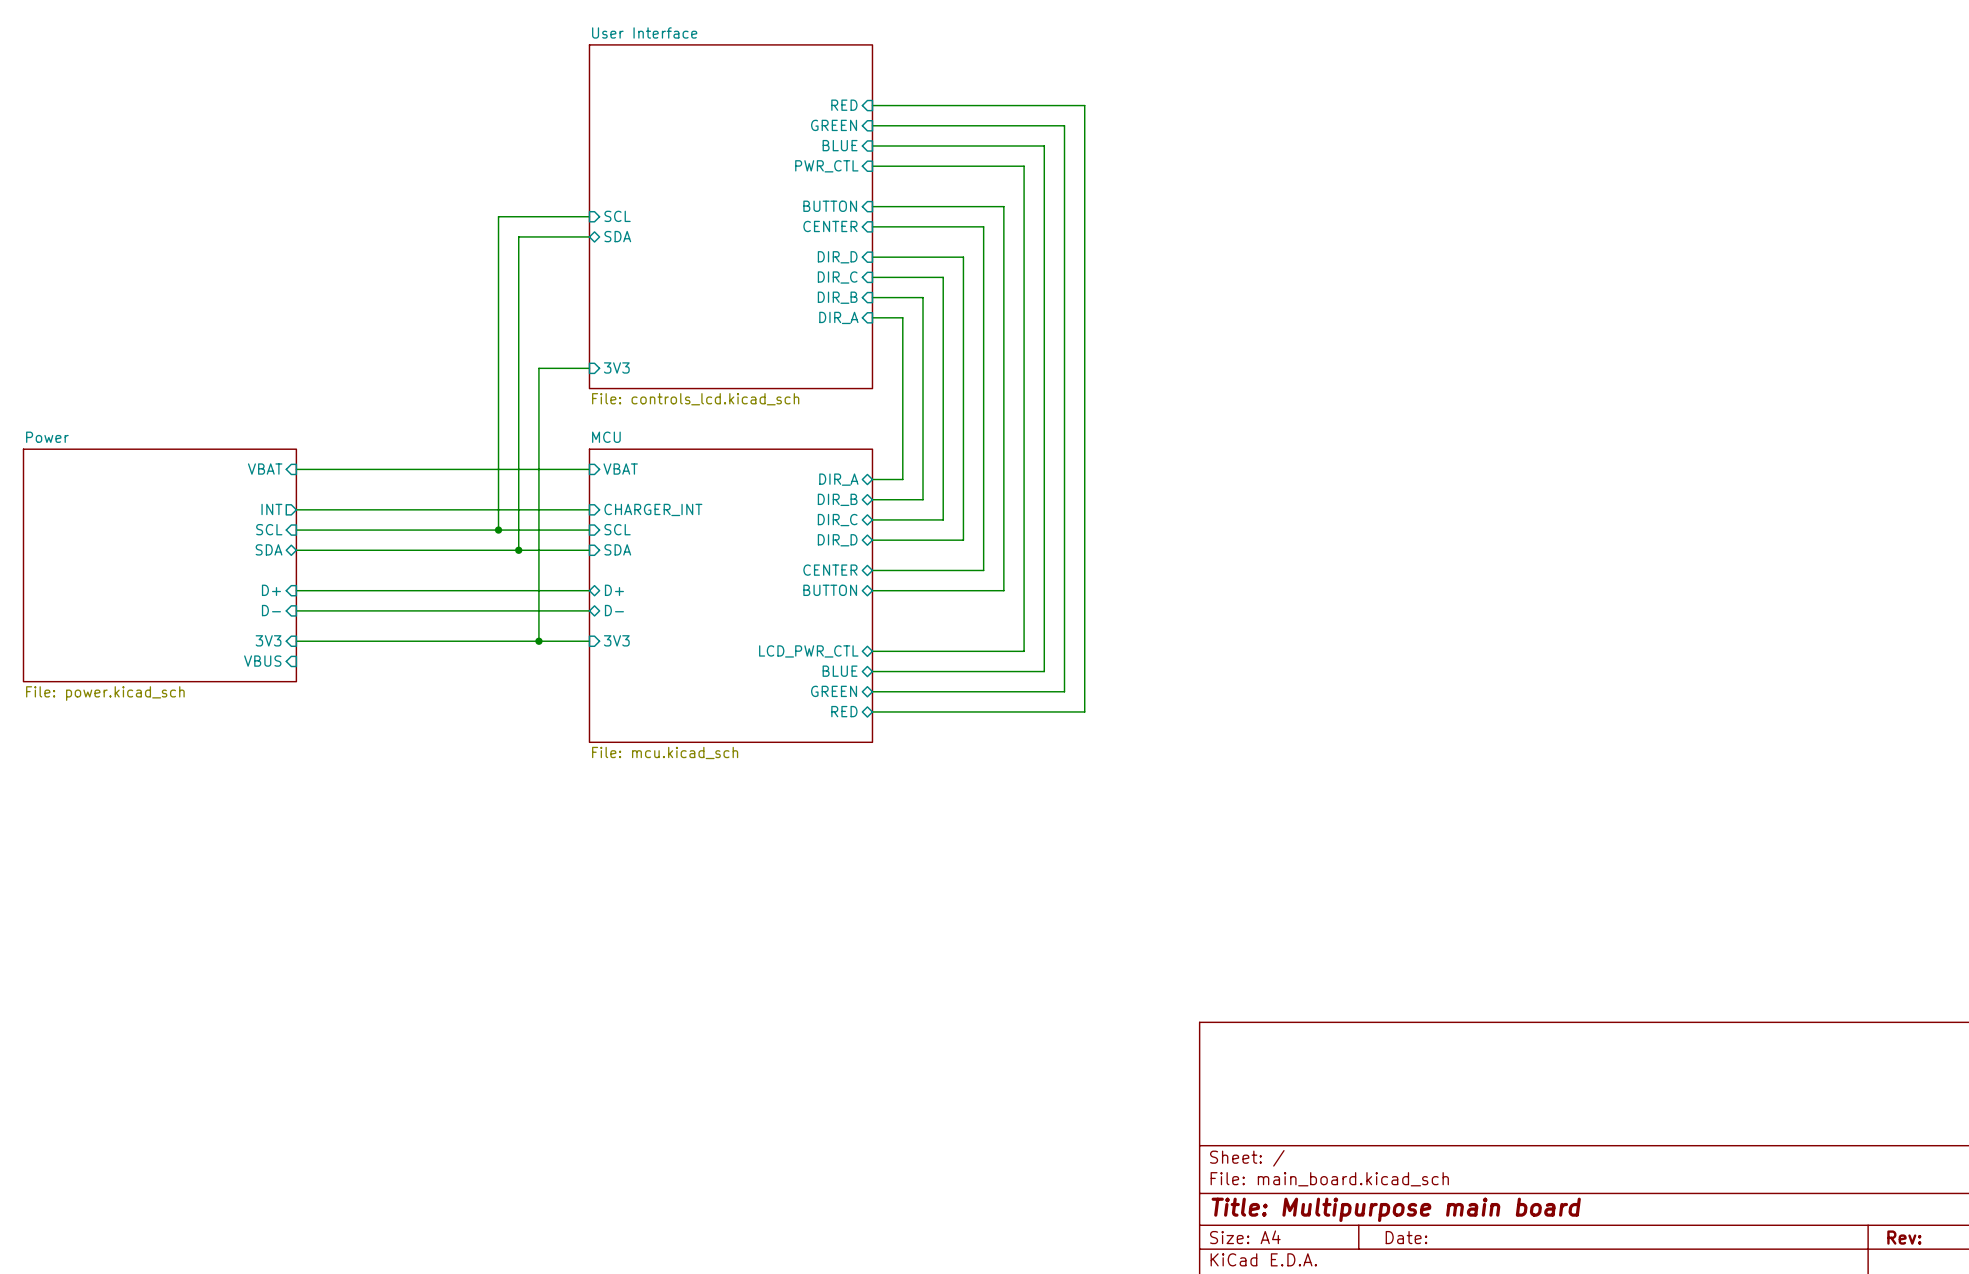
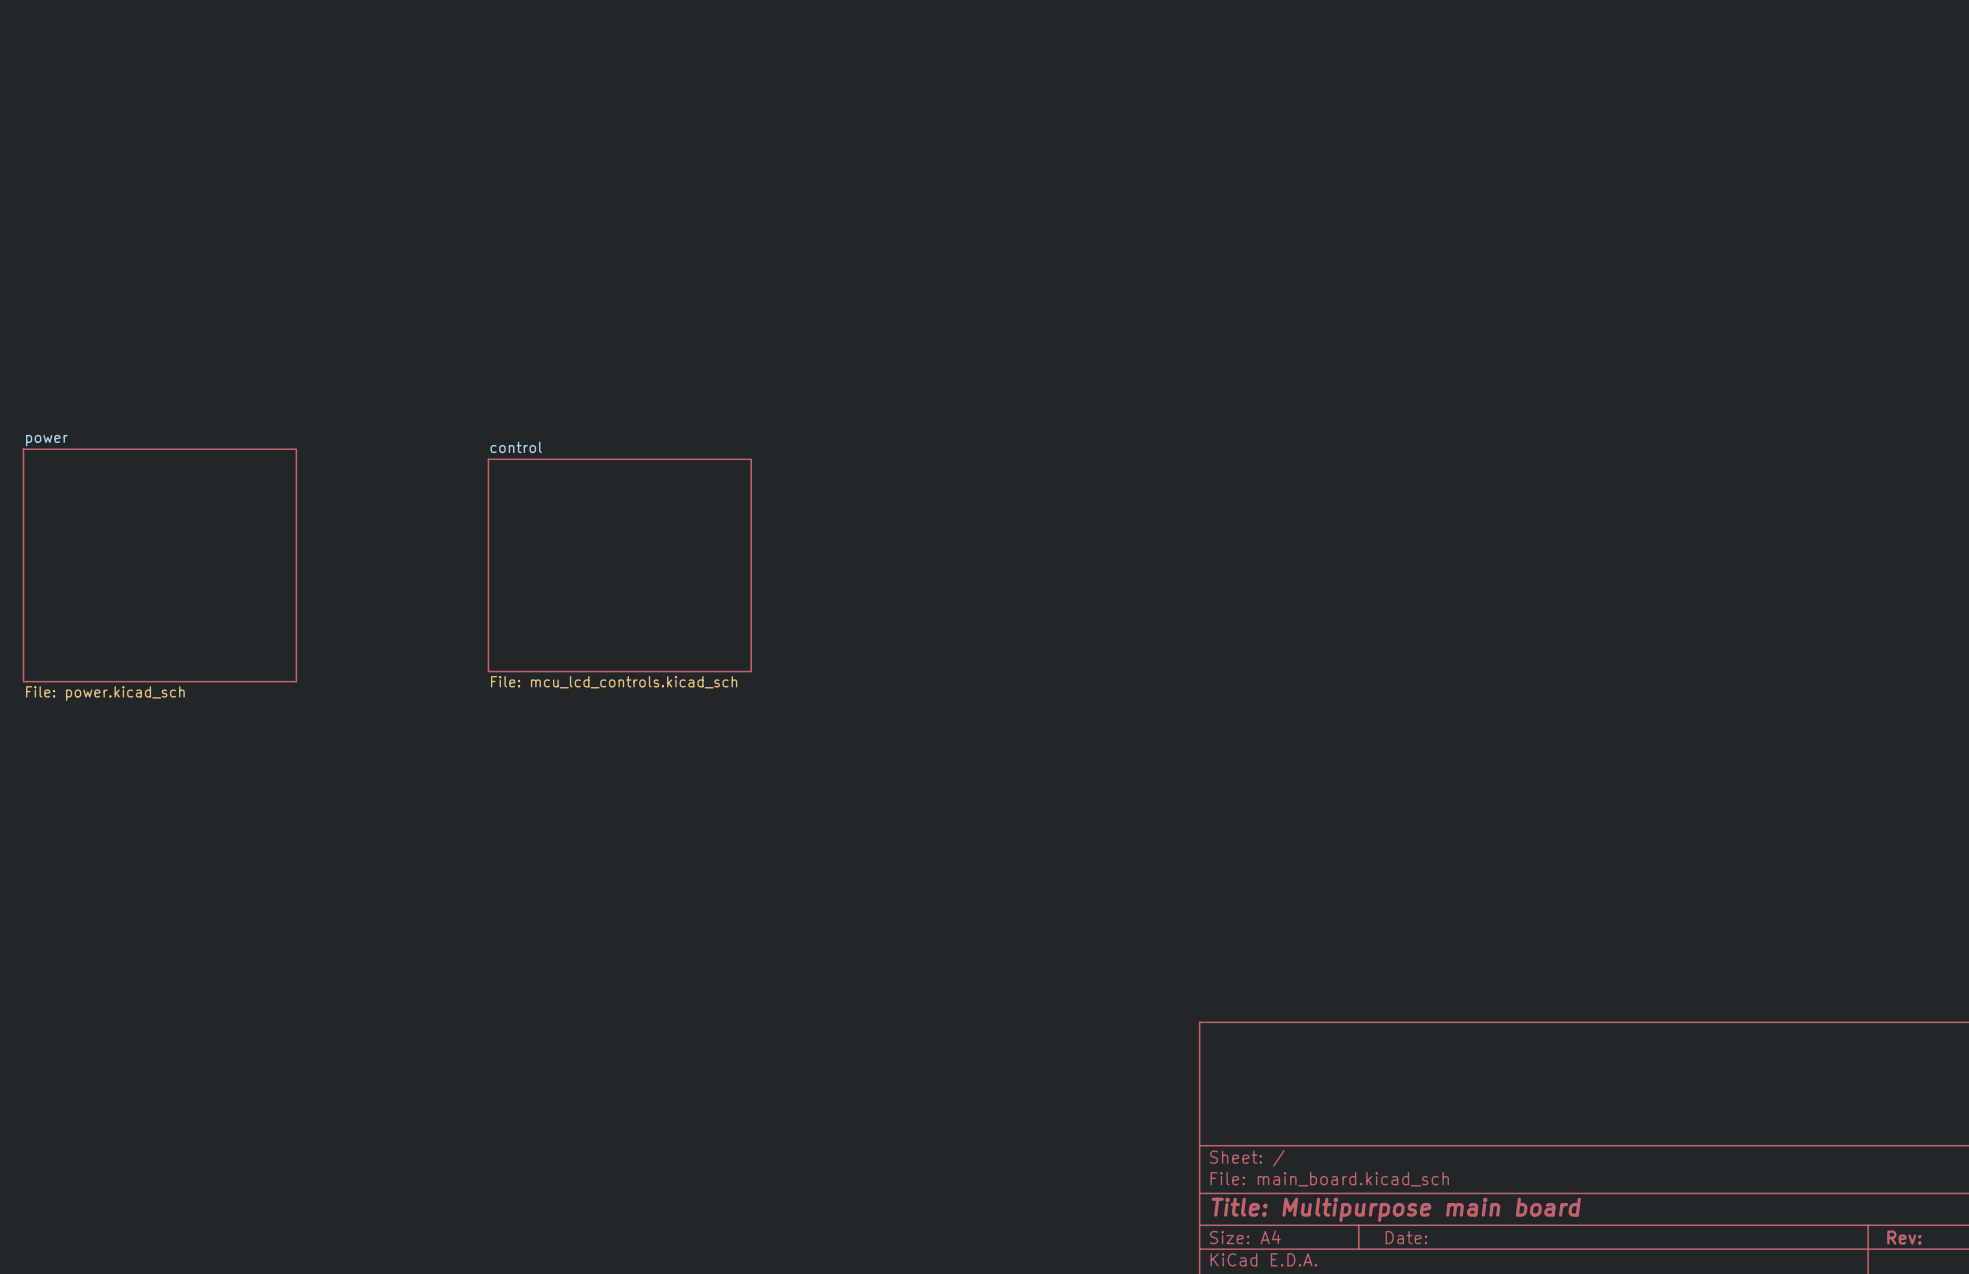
sheet pin: RED (844, 105) -> none
wire: (872, 105) (1084, 105) (1084, 711) (872, 711) -> none
sheet pin: GREEN (834, 125) -> none
wire: (872, 125) (1064, 125) (1064, 691) (872, 691) -> none
sheet pin: BLUE (840, 145) -> none
wire: (872, 145) (1044, 145) (1044, 671) (872, 671) -> none
sheet pin: PWR_CTL (826, 166) -> none
wire: (872, 166) (1024, 166) (1024, 651) (872, 651) -> none
sheet pin: BUTTON (830, 206) -> none
wire: (872, 206) (1003, 206) (1003, 590) (872, 590) -> none
wire: (589, 216) (498, 216) (498, 530) -> none
sheet pin: SCL (617, 216) -> none
sheet User Interface: File: controls_lcd.kicad_sch (730, 216) -> none
sheet pin: CENTER (830, 226) -> none
wire: (872, 226) (983, 226) (983, 570) (872, 570) -> none
wire: (589, 236) (518, 236) (518, 550) -> none
sheet pin: SDA (617, 236) -> none
sheet pin: DIR_D (837, 257) -> none
wire: (872, 257) (963, 257) (963, 540) (872, 540) -> none
sheet pin: DIR_C (837, 277) -> none
wire: (872, 277) (943, 277) (943, 519) (872, 519) -> none
sheet pin: DIR_B (837, 297) -> none
wire: (872, 297) (923, 297) (923, 499) (872, 499) -> none
sheet pin: DIR_A (838, 317) -> none
wire: (872, 317) (902, 317) (902, 479) (872, 479) -> none
sheet pin: 3V3 (616, 367) -> none
wire: (589, 368) (538, 368) (538, 641) -> none
sheet Power name: Power (47, 437) -> power (46, 440)
sheet pin: VBAT (265, 469) -> none
wire: (296, 469) (589, 469) -> none
sheet pin: VBAT (620, 469) -> none
sheet pin: DIR_A (838, 479) -> none
sheet pin: DIR_B (837, 499) -> none
sheet pin: INT (271, 509) -> none
wire: (296, 509) (589, 509) -> none
sheet pin: CHARGER_INT (653, 509) -> none
sheet pin: DIR_C (837, 520) -> none
sheet pin: SCL (269, 529) -> none
sheet pin: SCL (617, 529) -> none
wire: (296, 530) (589, 530) -> none
junction: (498, 530) -> none
sheet pin: DIR_D (837, 540) -> none
sheet pin: SDA (269, 549) -> none
sheet pin: SDA (617, 549) -> none
wire: (296, 550) (589, 550) -> none
junction: (518, 550) -> none
sheet control: none -> File: mcu_lcd_controls.kicad_sch (619, 565)
sheet pin: CENTER (830, 570) -> none
sheet pin: D+ (271, 590) -> none
wire: (296, 590) (589, 590) -> none
sheet pin: D+ (614, 590) -> none
sheet pin: BUTTON (830, 590) -> none
sheet MCU: File: mcu.kicad_sch (730, 595) -> none
sheet pin: D- (271, 610) -> none
wire: (296, 610) (589, 610) -> none
sheet pin: D- (614, 610) -> none
sheet pin: 3V3 (268, 640) -> none
sheet pin: 3V3 (616, 640) -> none
wire: (296, 641) (589, 641) -> none
junction: (538, 641) -> none
sheet pin: LCD_PWR_CTL (808, 651) -> none
sheet pin: VBUS (262, 661) -> none
sheet pin: BLUE (840, 671) -> none
sheet pin: GREEN (834, 691) -> none
sheet pin: RED (844, 711) -> none

